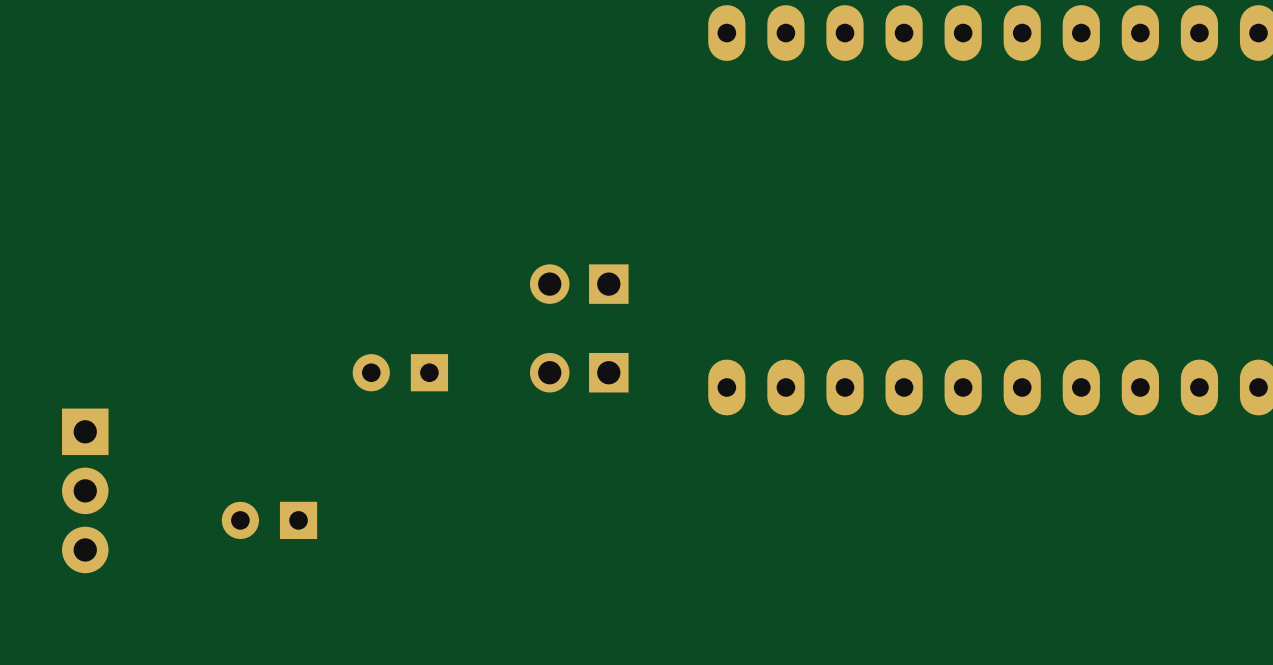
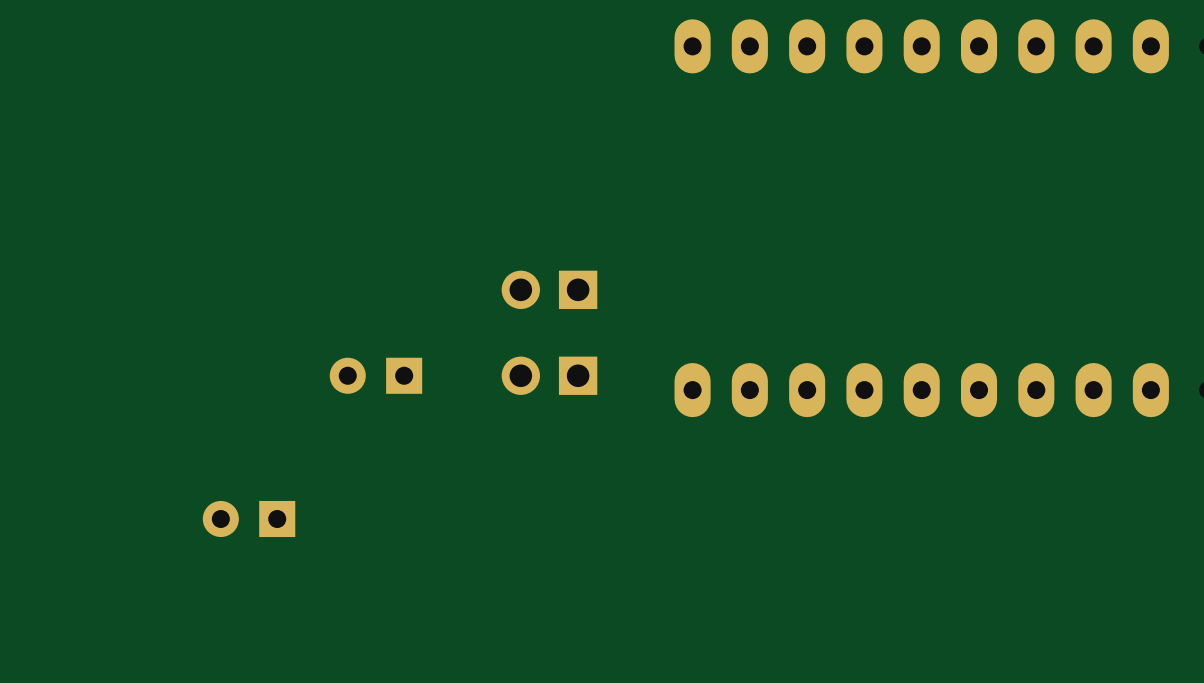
part: (85, 490) -> none

